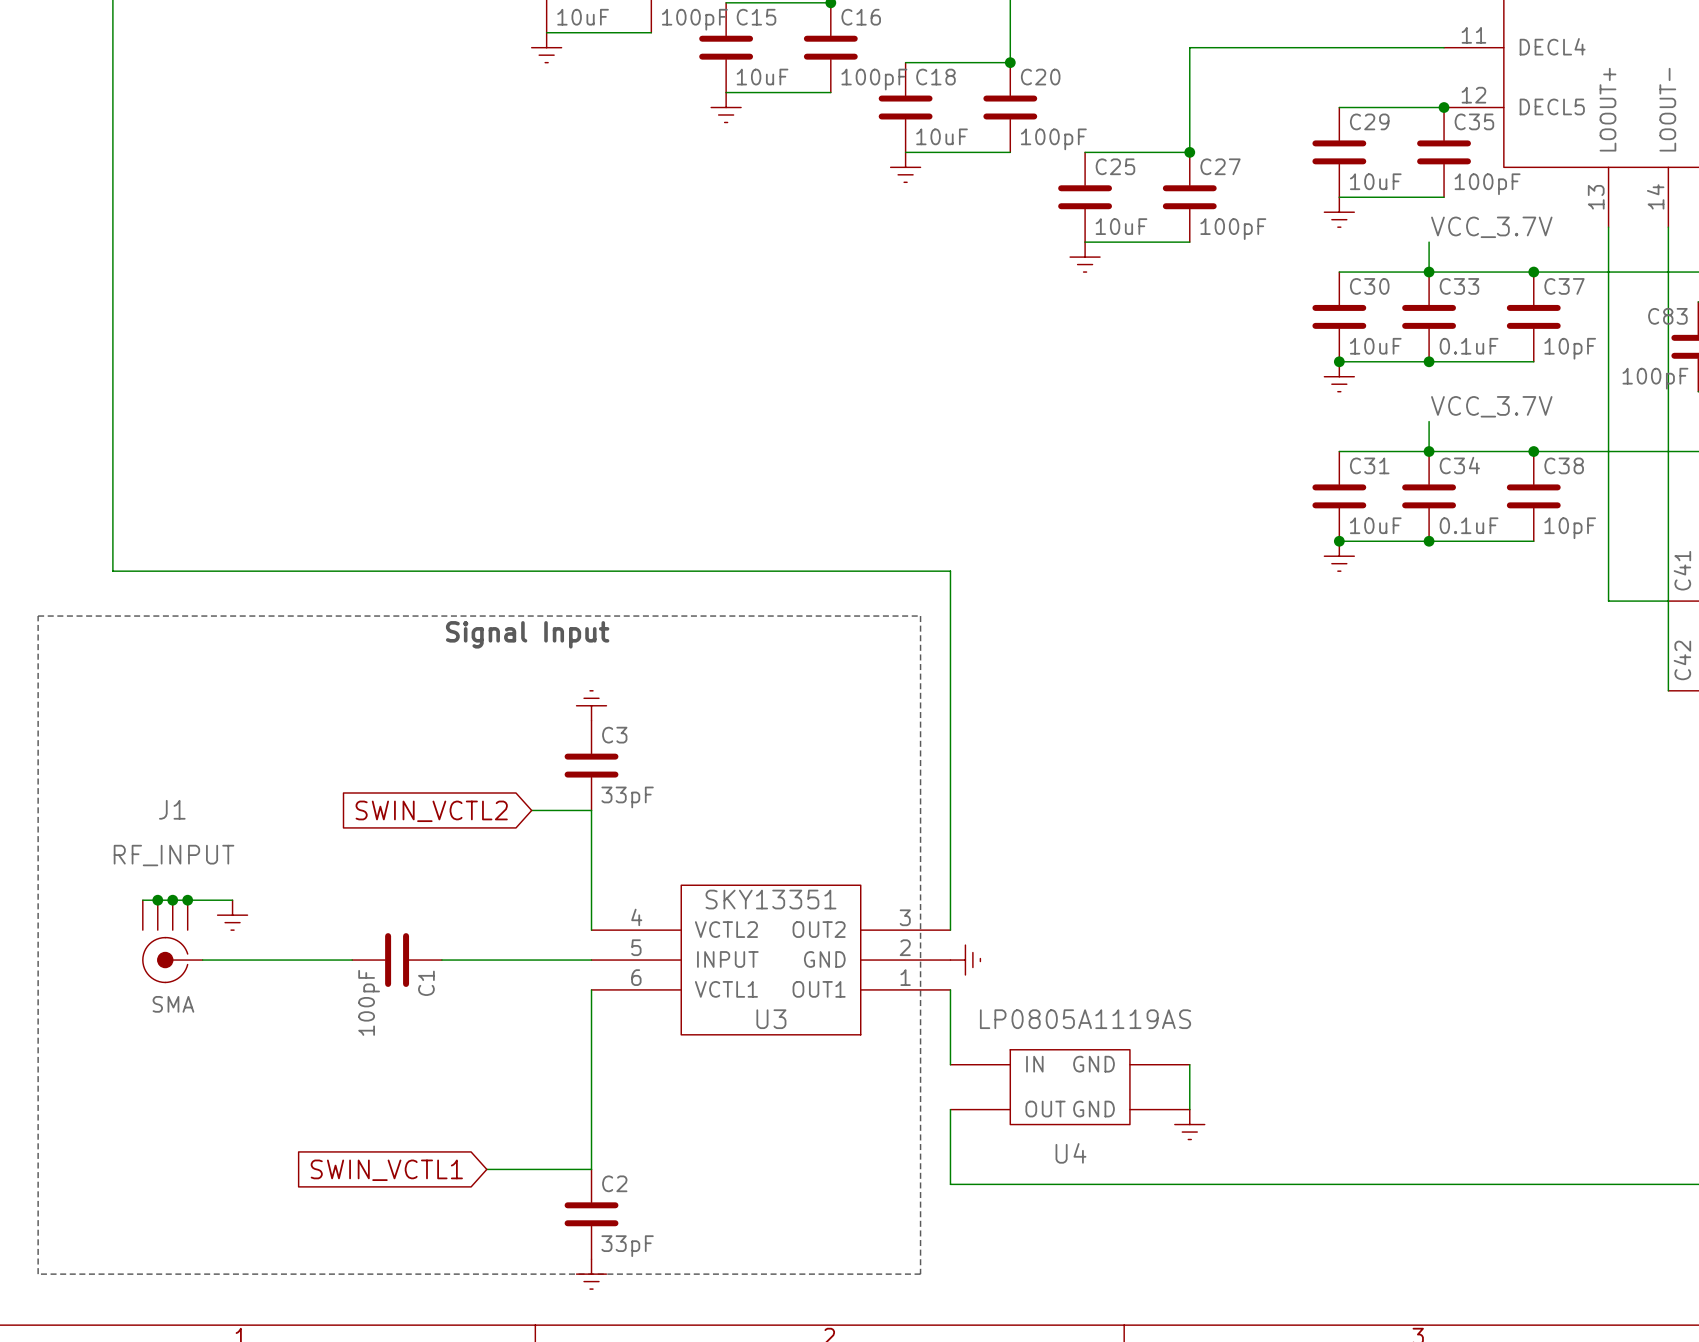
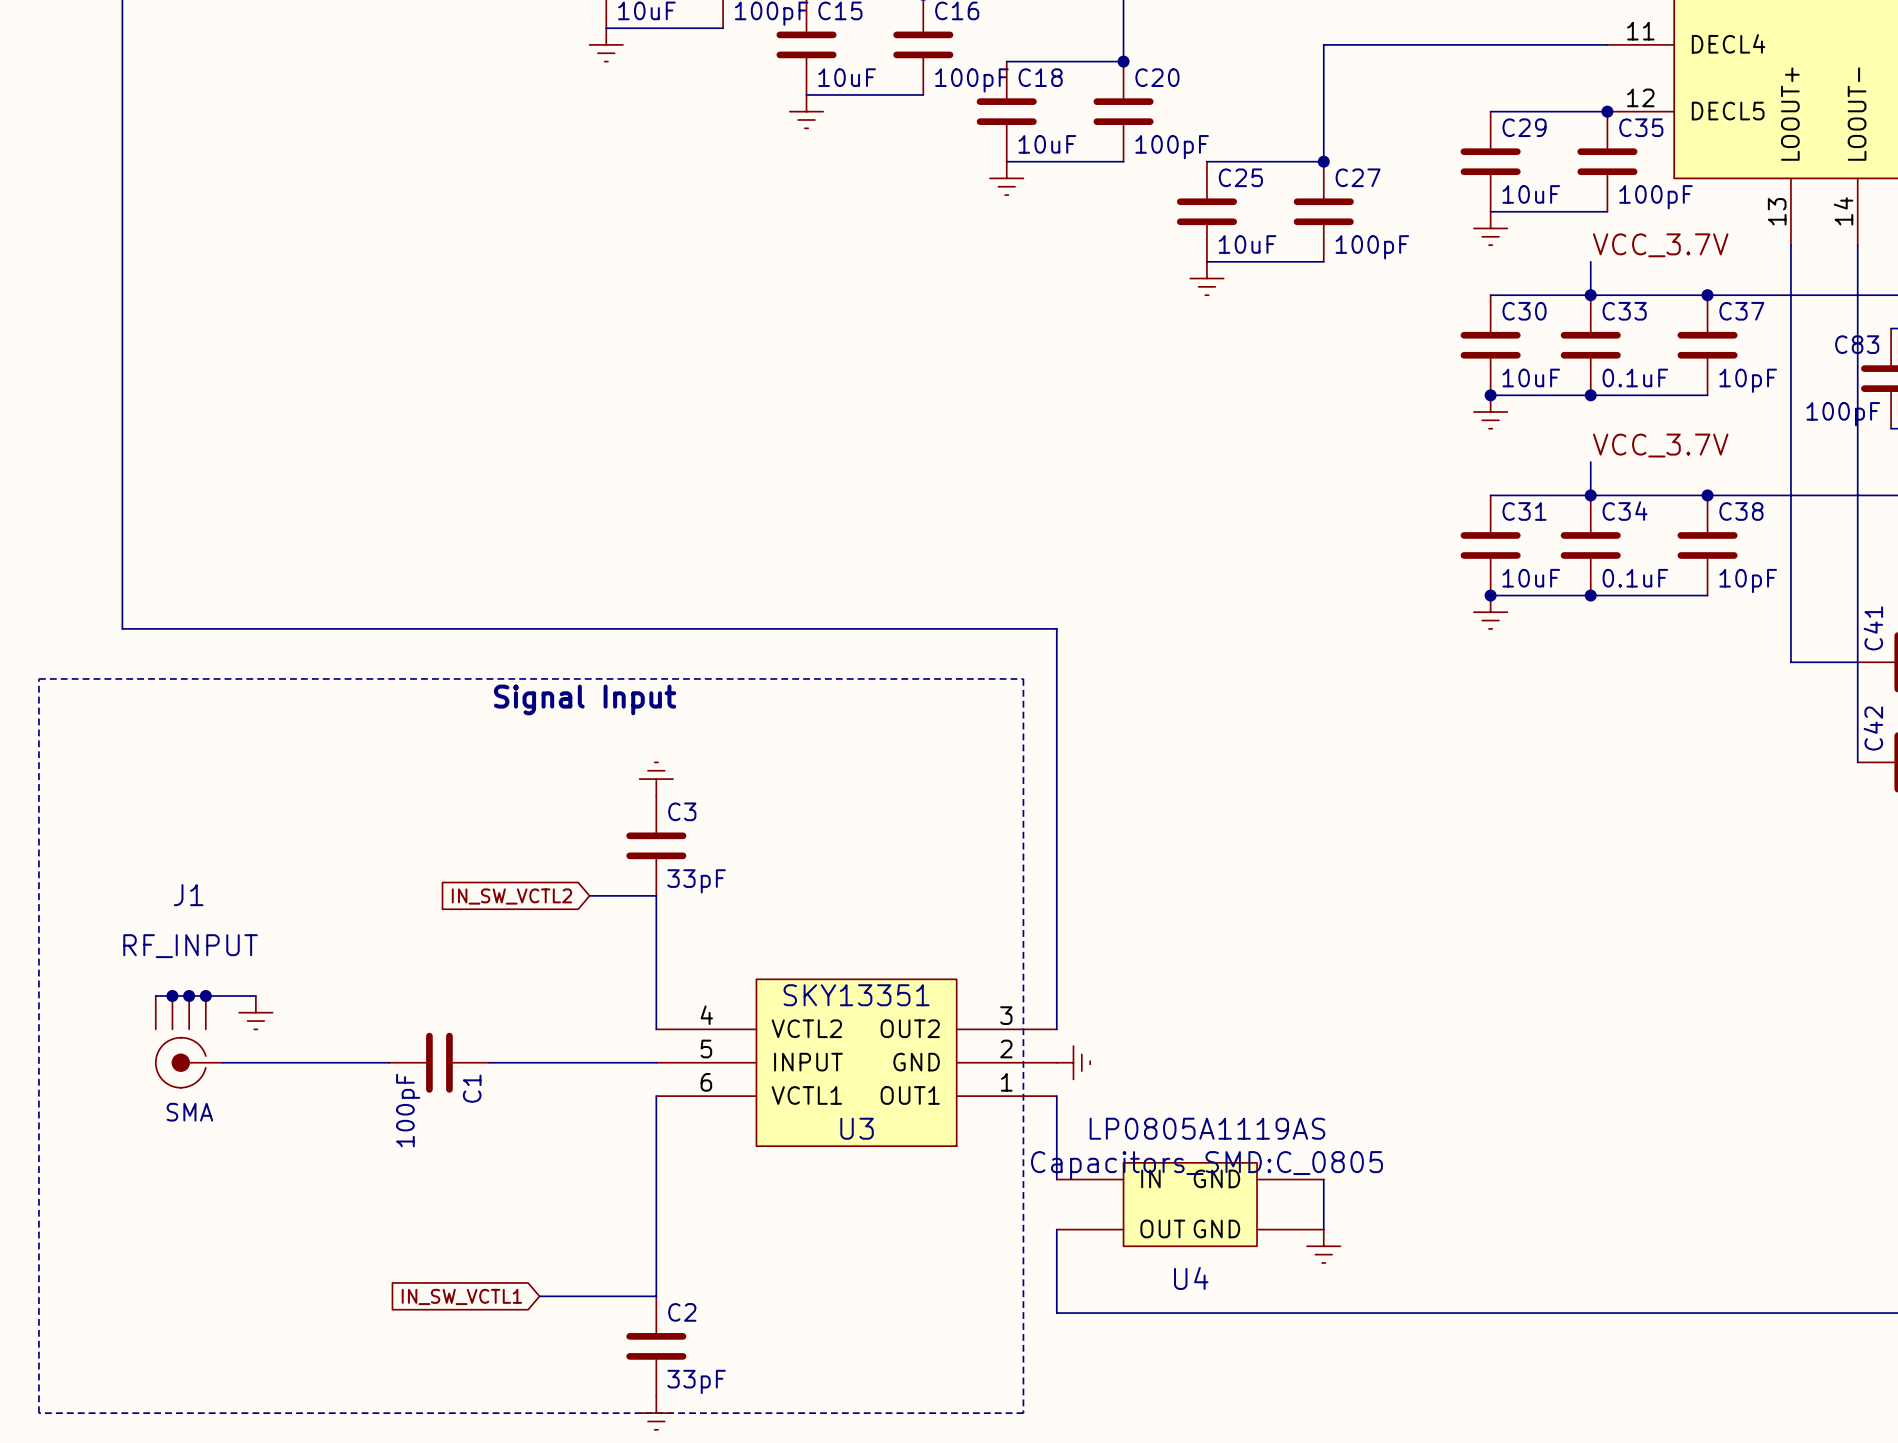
global label: SWIN_VCTL2 (431, 811) -> IN_SW_VCTL2 (511, 896)
U4 text: none -> Capacitors_SMD:C_0805 (1206, 1165)
global label: SWIN_VCTL1 (386, 1170) -> IN_SW_VCTL1 (461, 1296)

